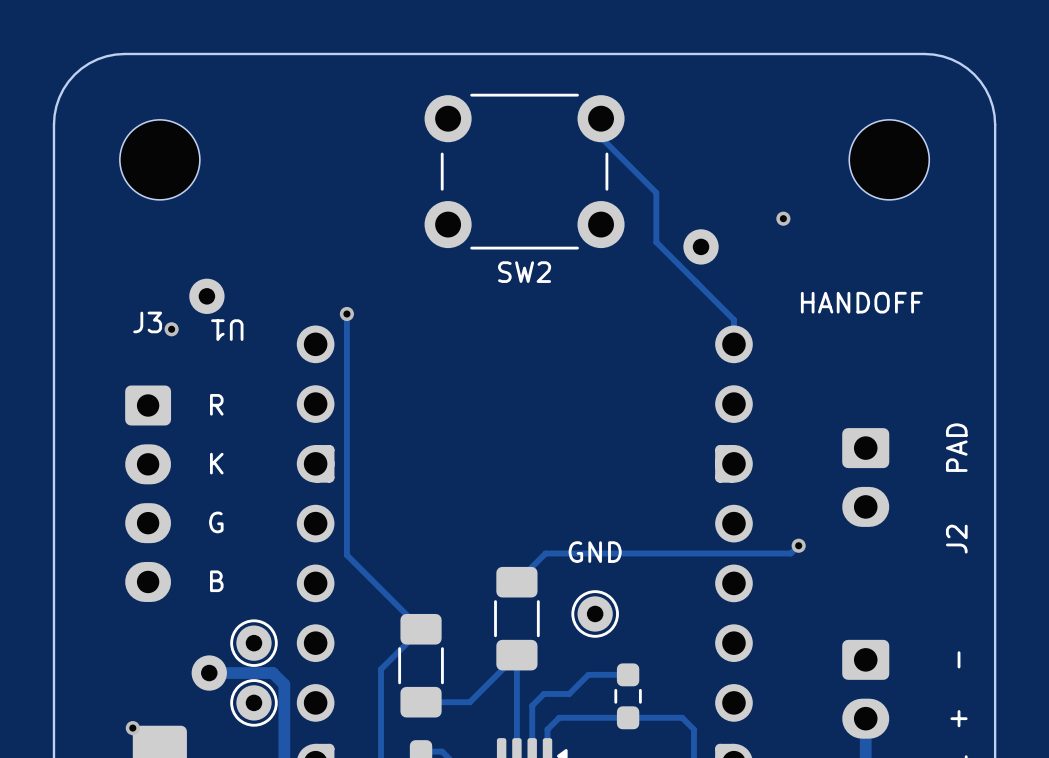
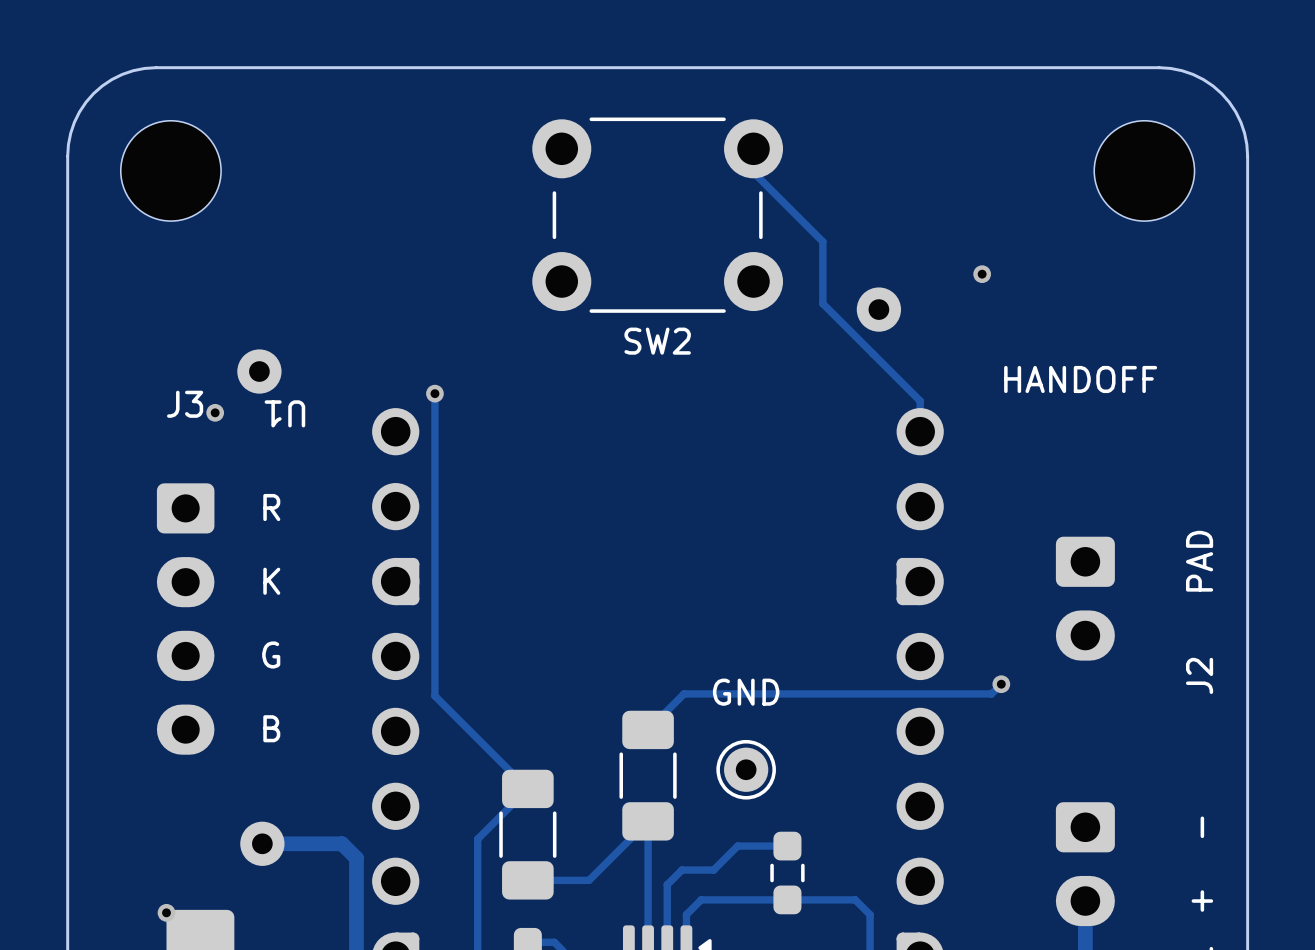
part position: (159, 159) -> (170, 170)
part position: (889, 159) -> (1144, 170)
part: (253, 643) -> none
part: (253, 702) -> none

